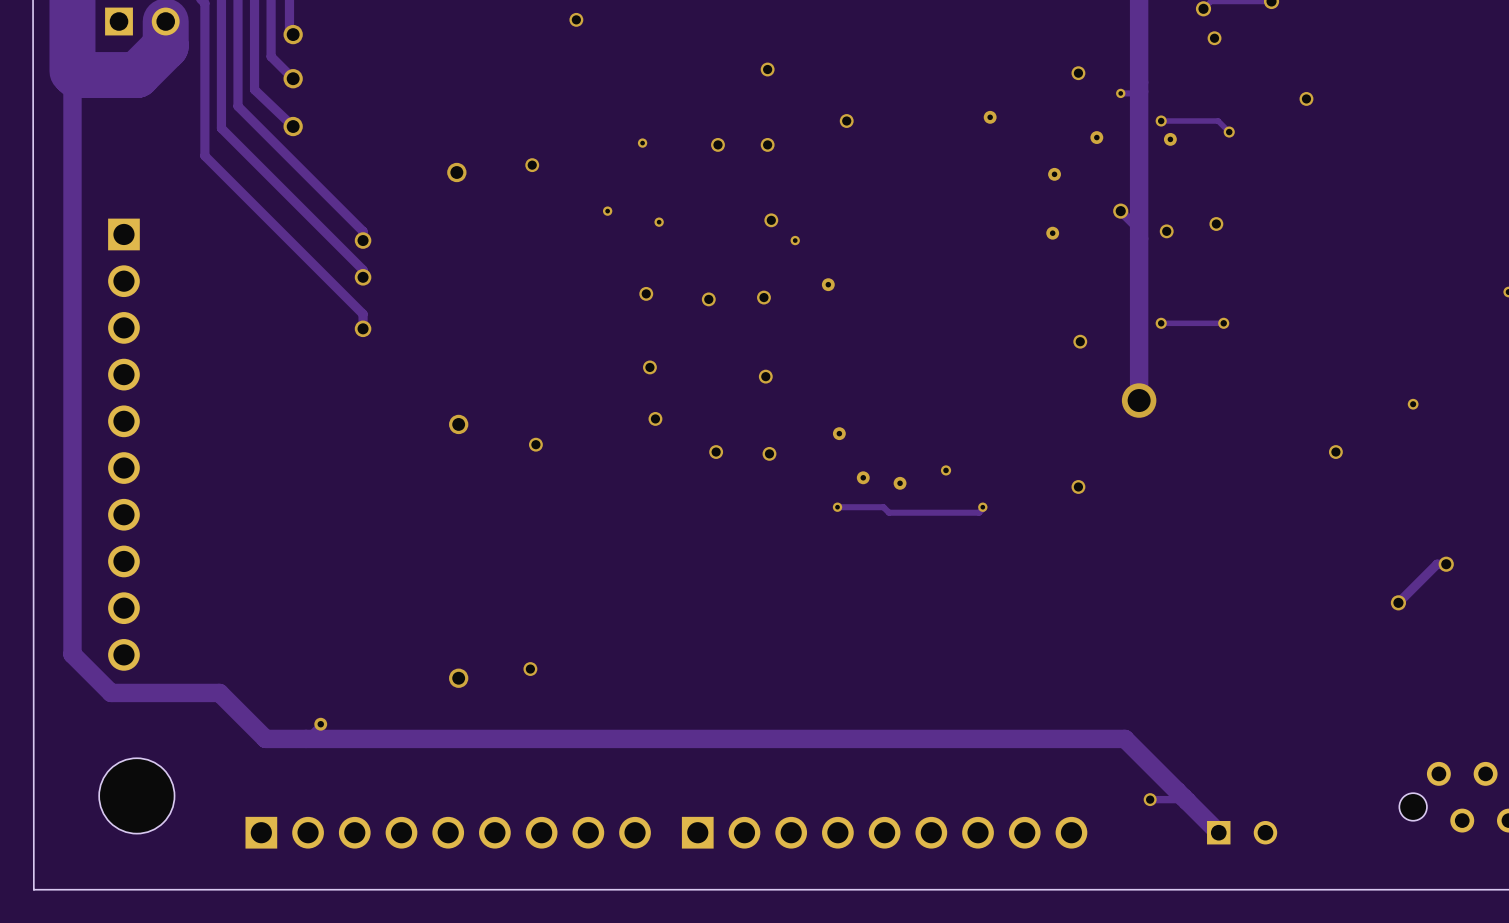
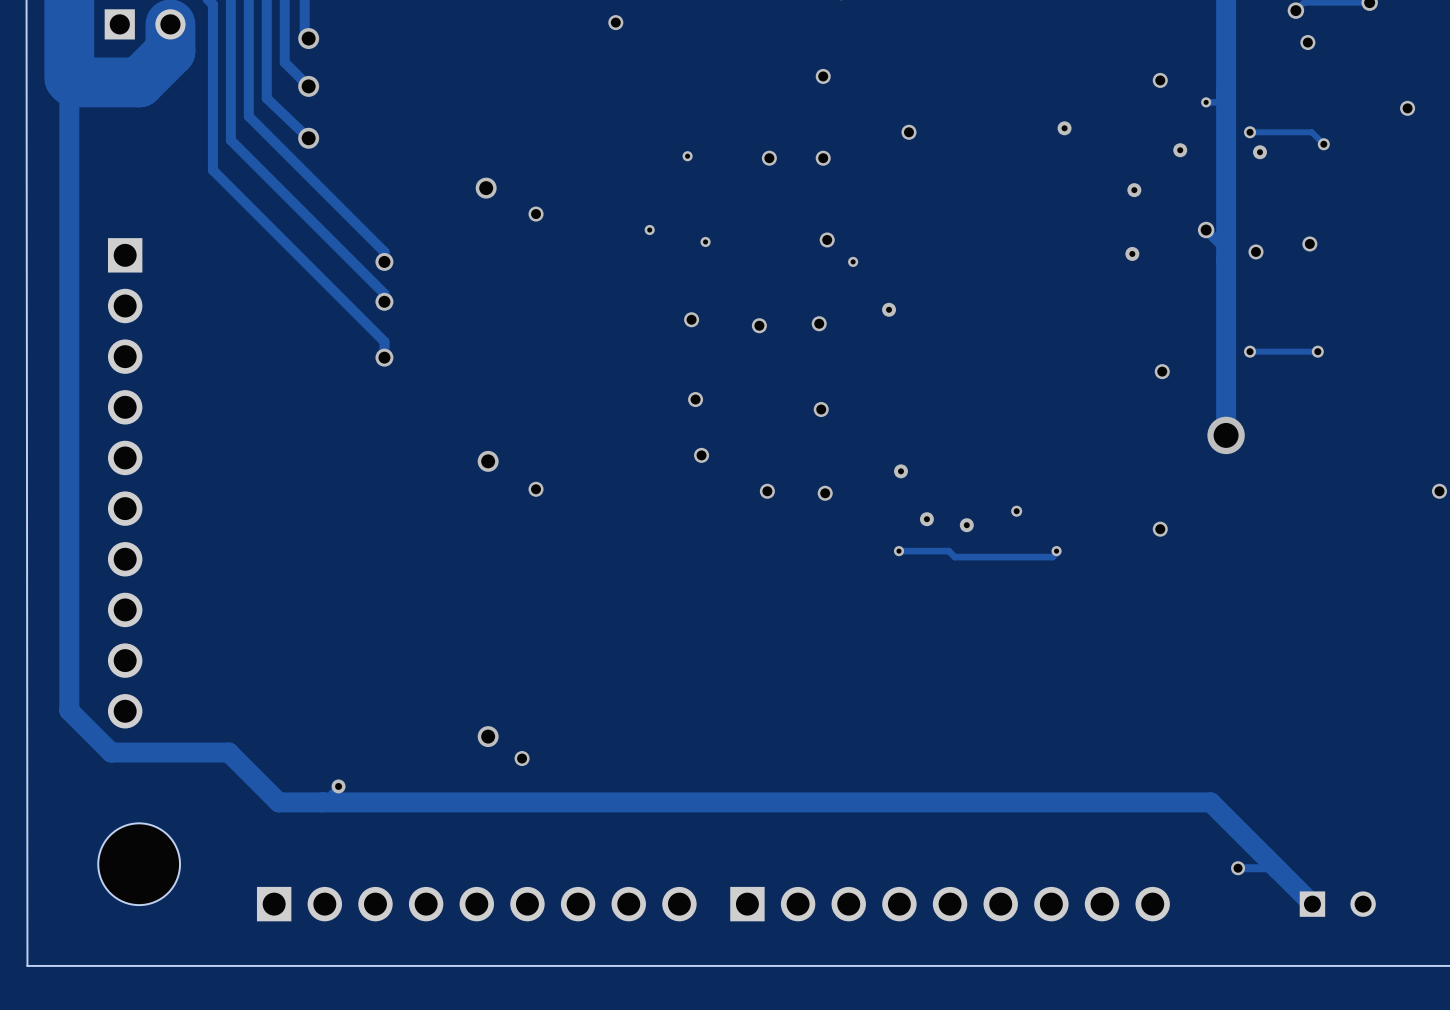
via position: (532, 165) -> (536, 214)
via position: (535, 444) -> (536, 489)
via position: (530, 669) -> (522, 758)

